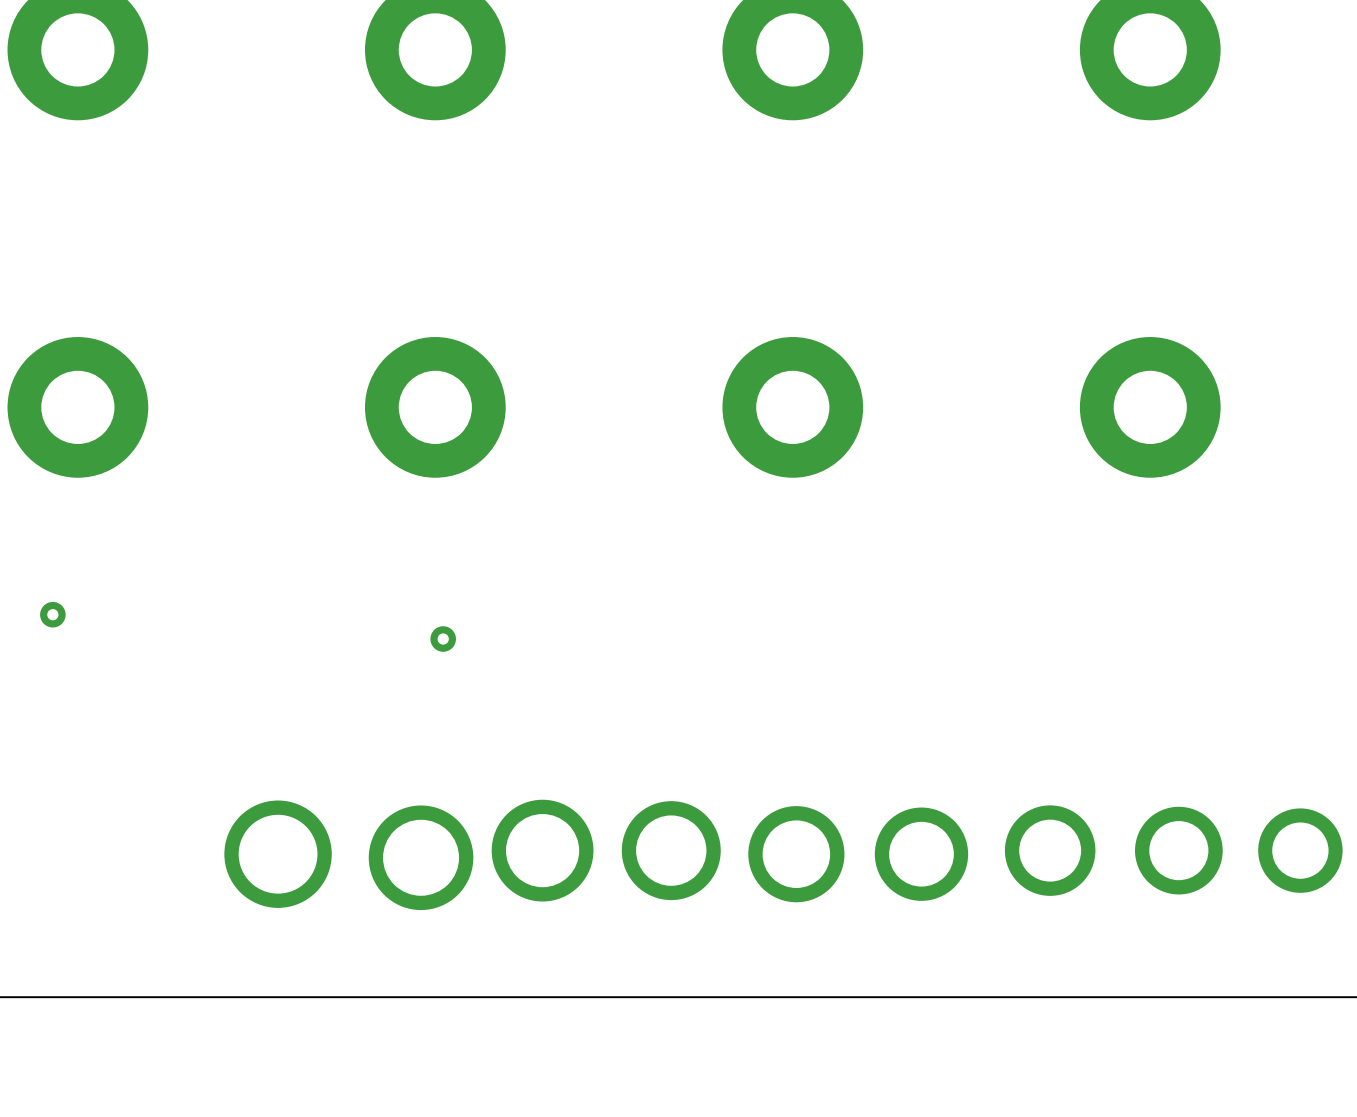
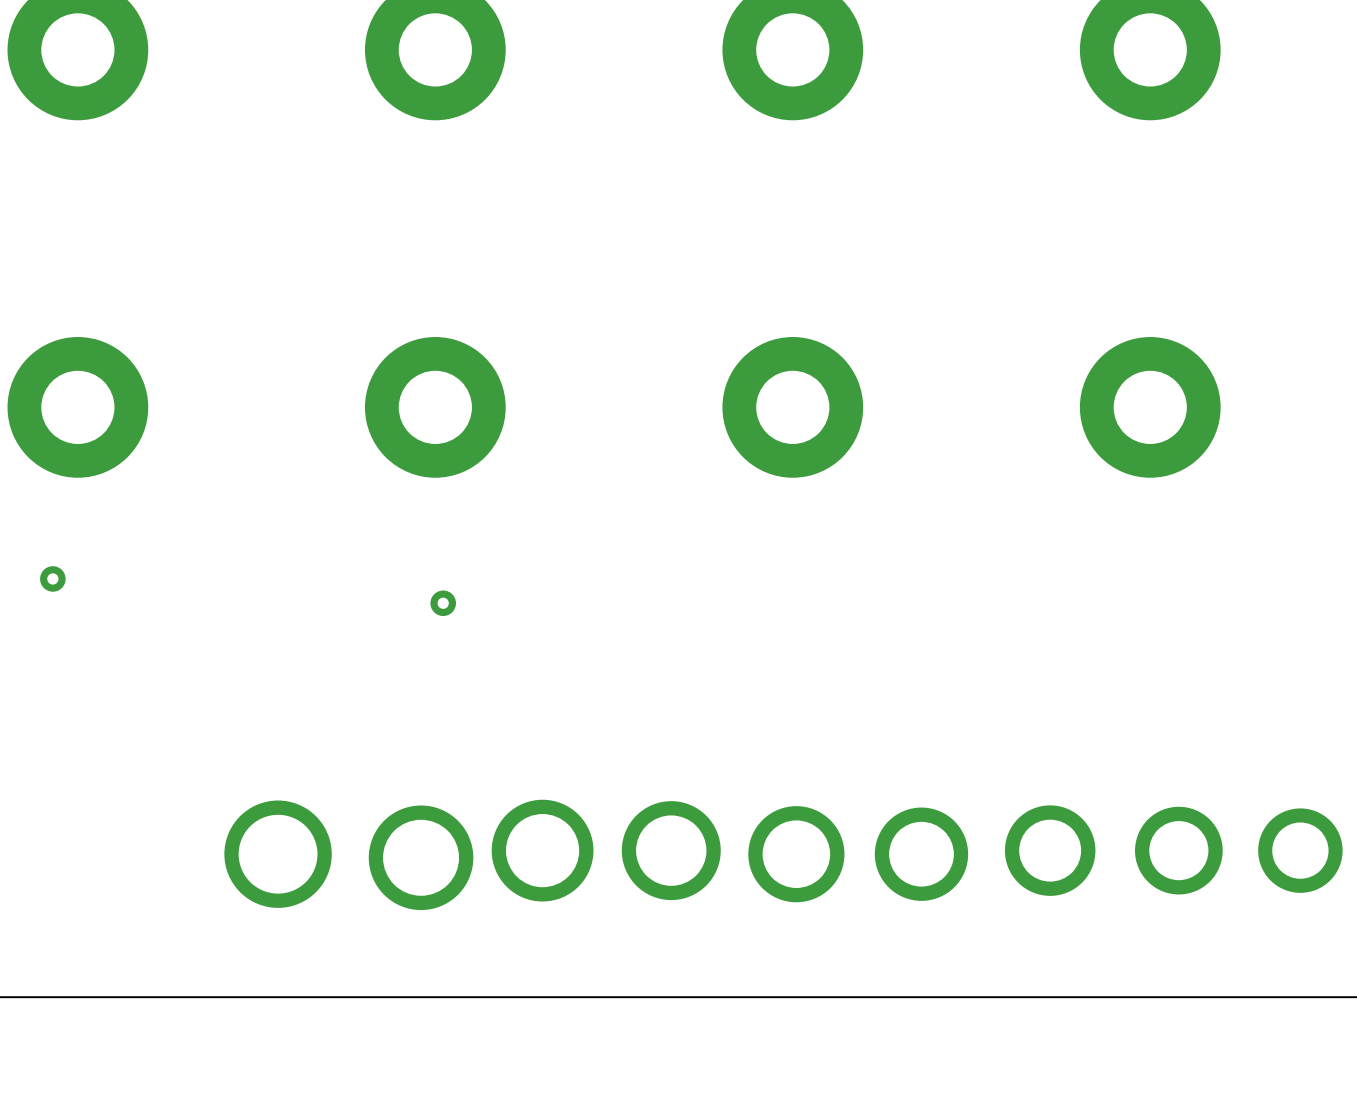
via position: (52, 614) -> (52, 578)
via position: (443, 639) -> (443, 603)

